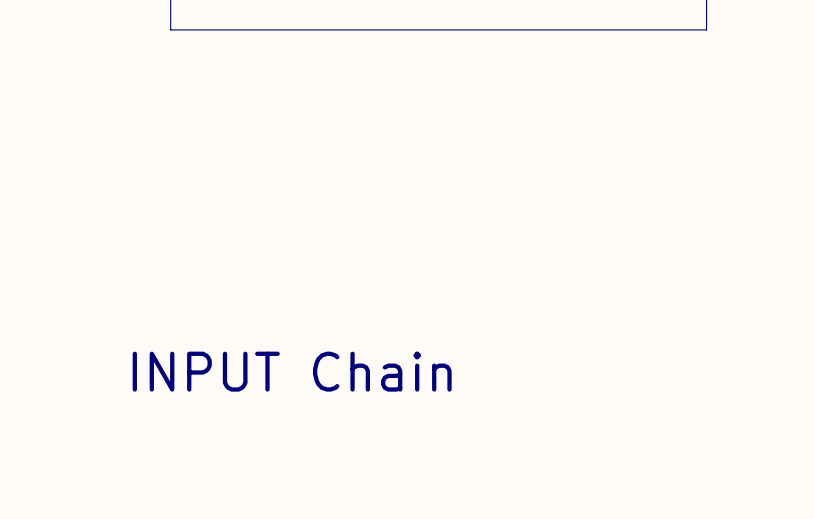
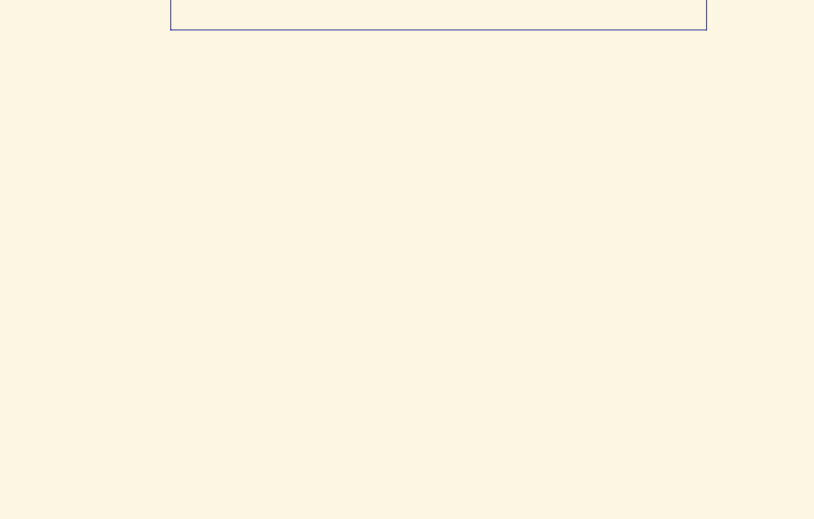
text: INPUT Chain (292, 371) -> none

